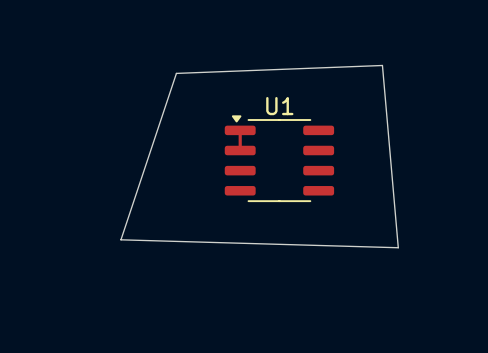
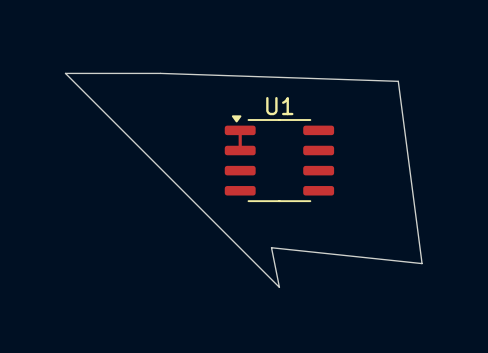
board edge: (382, 65) (398, 247) (120, 239) (176, 73) (382, 65) -> (65, 73) (160, 73) (398, 81) (422, 263) (271, 247) (279, 287) (65, 73)

